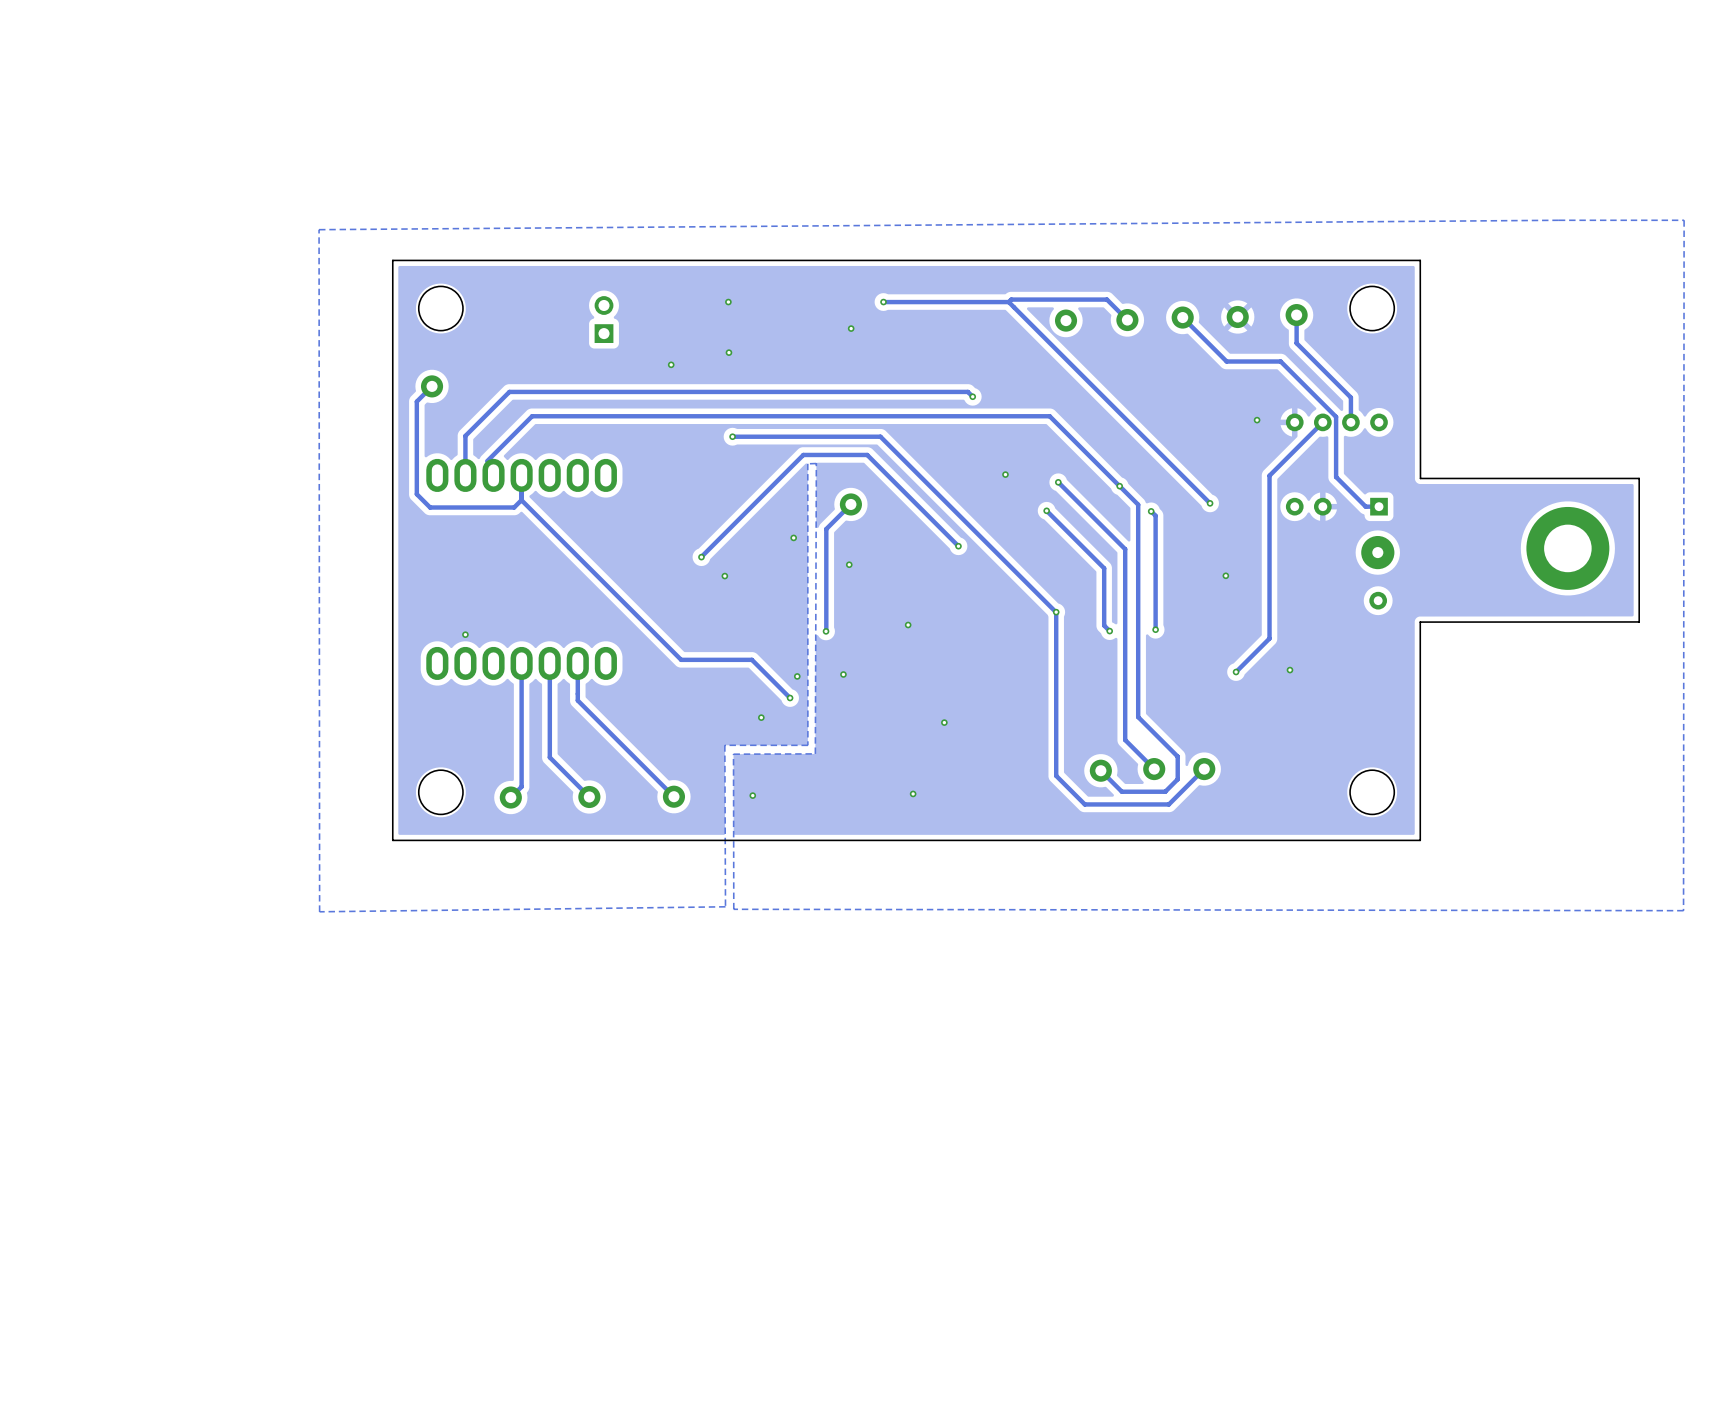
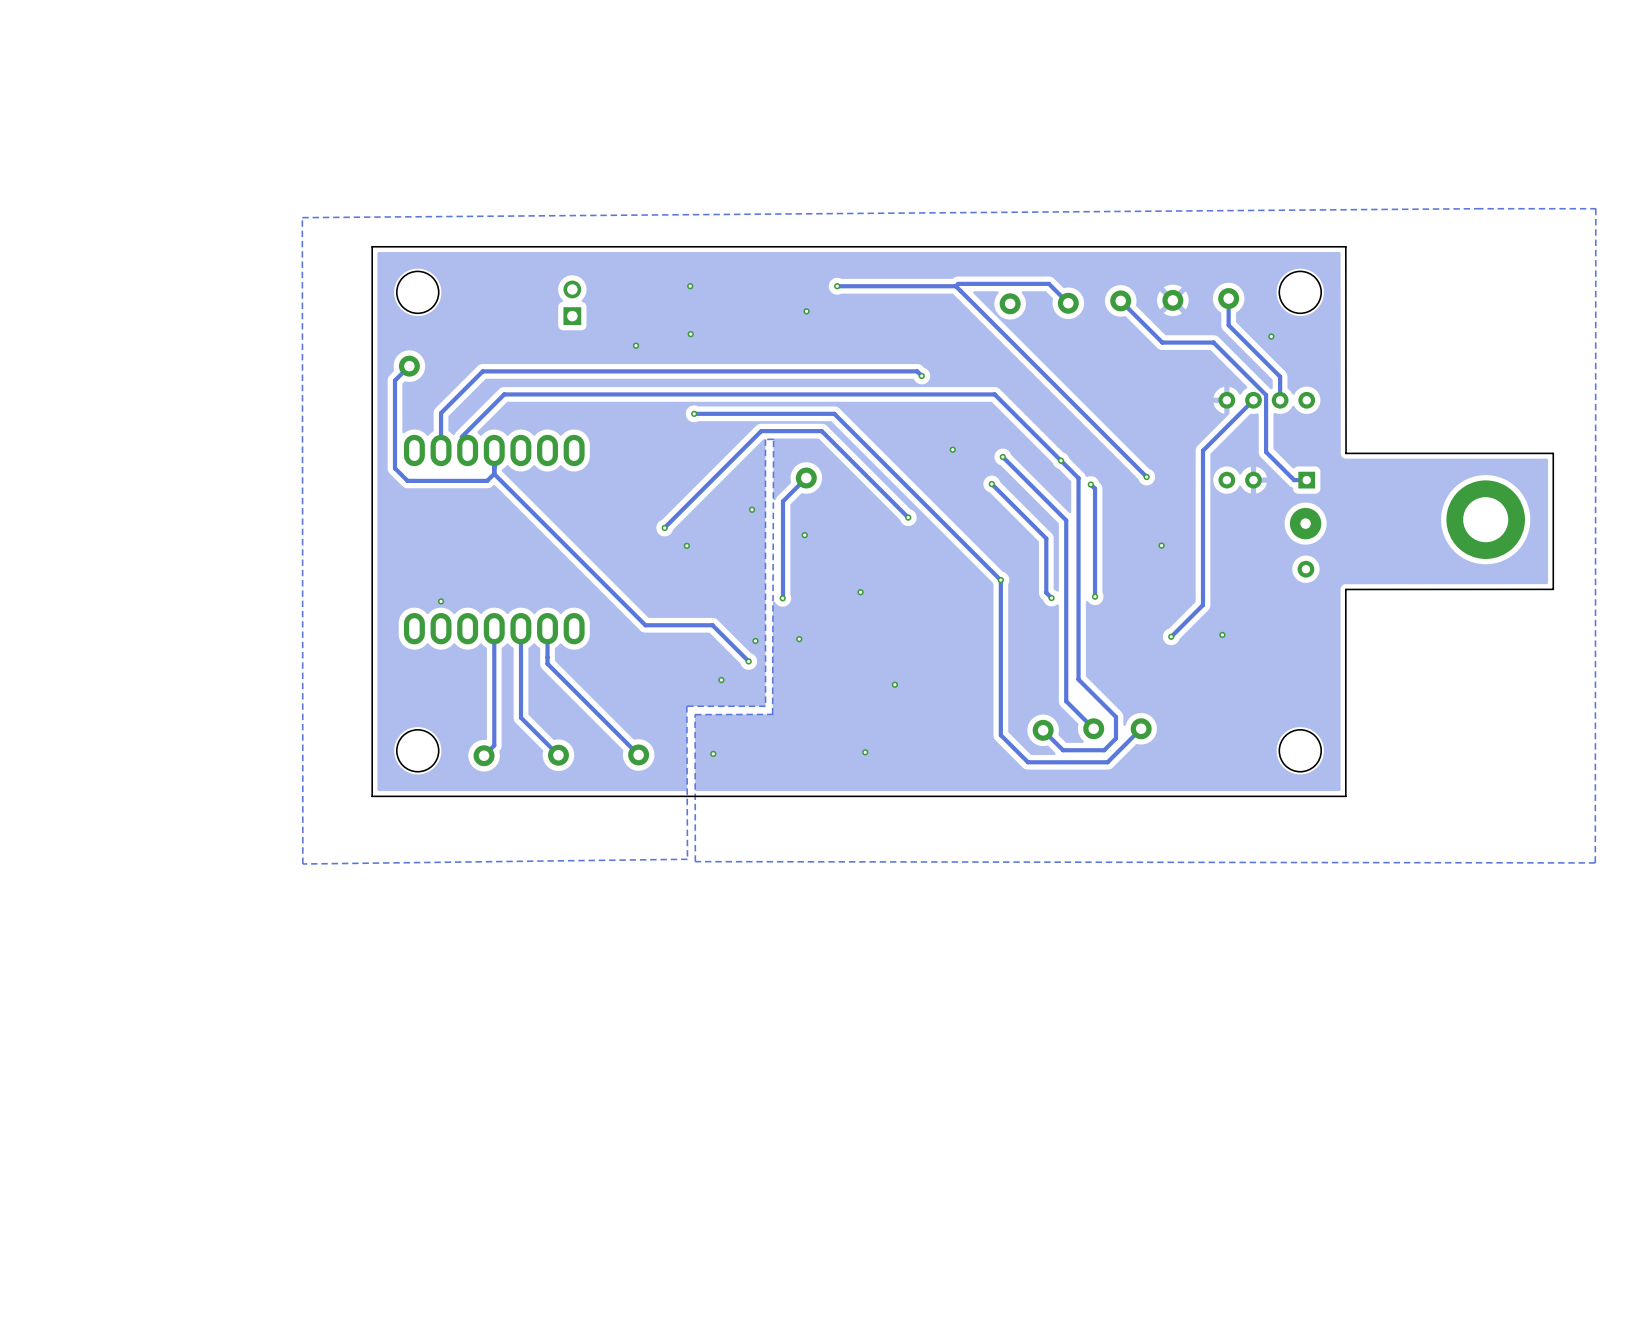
via: none -> (1271, 336)
via: (1257, 420) -> none

